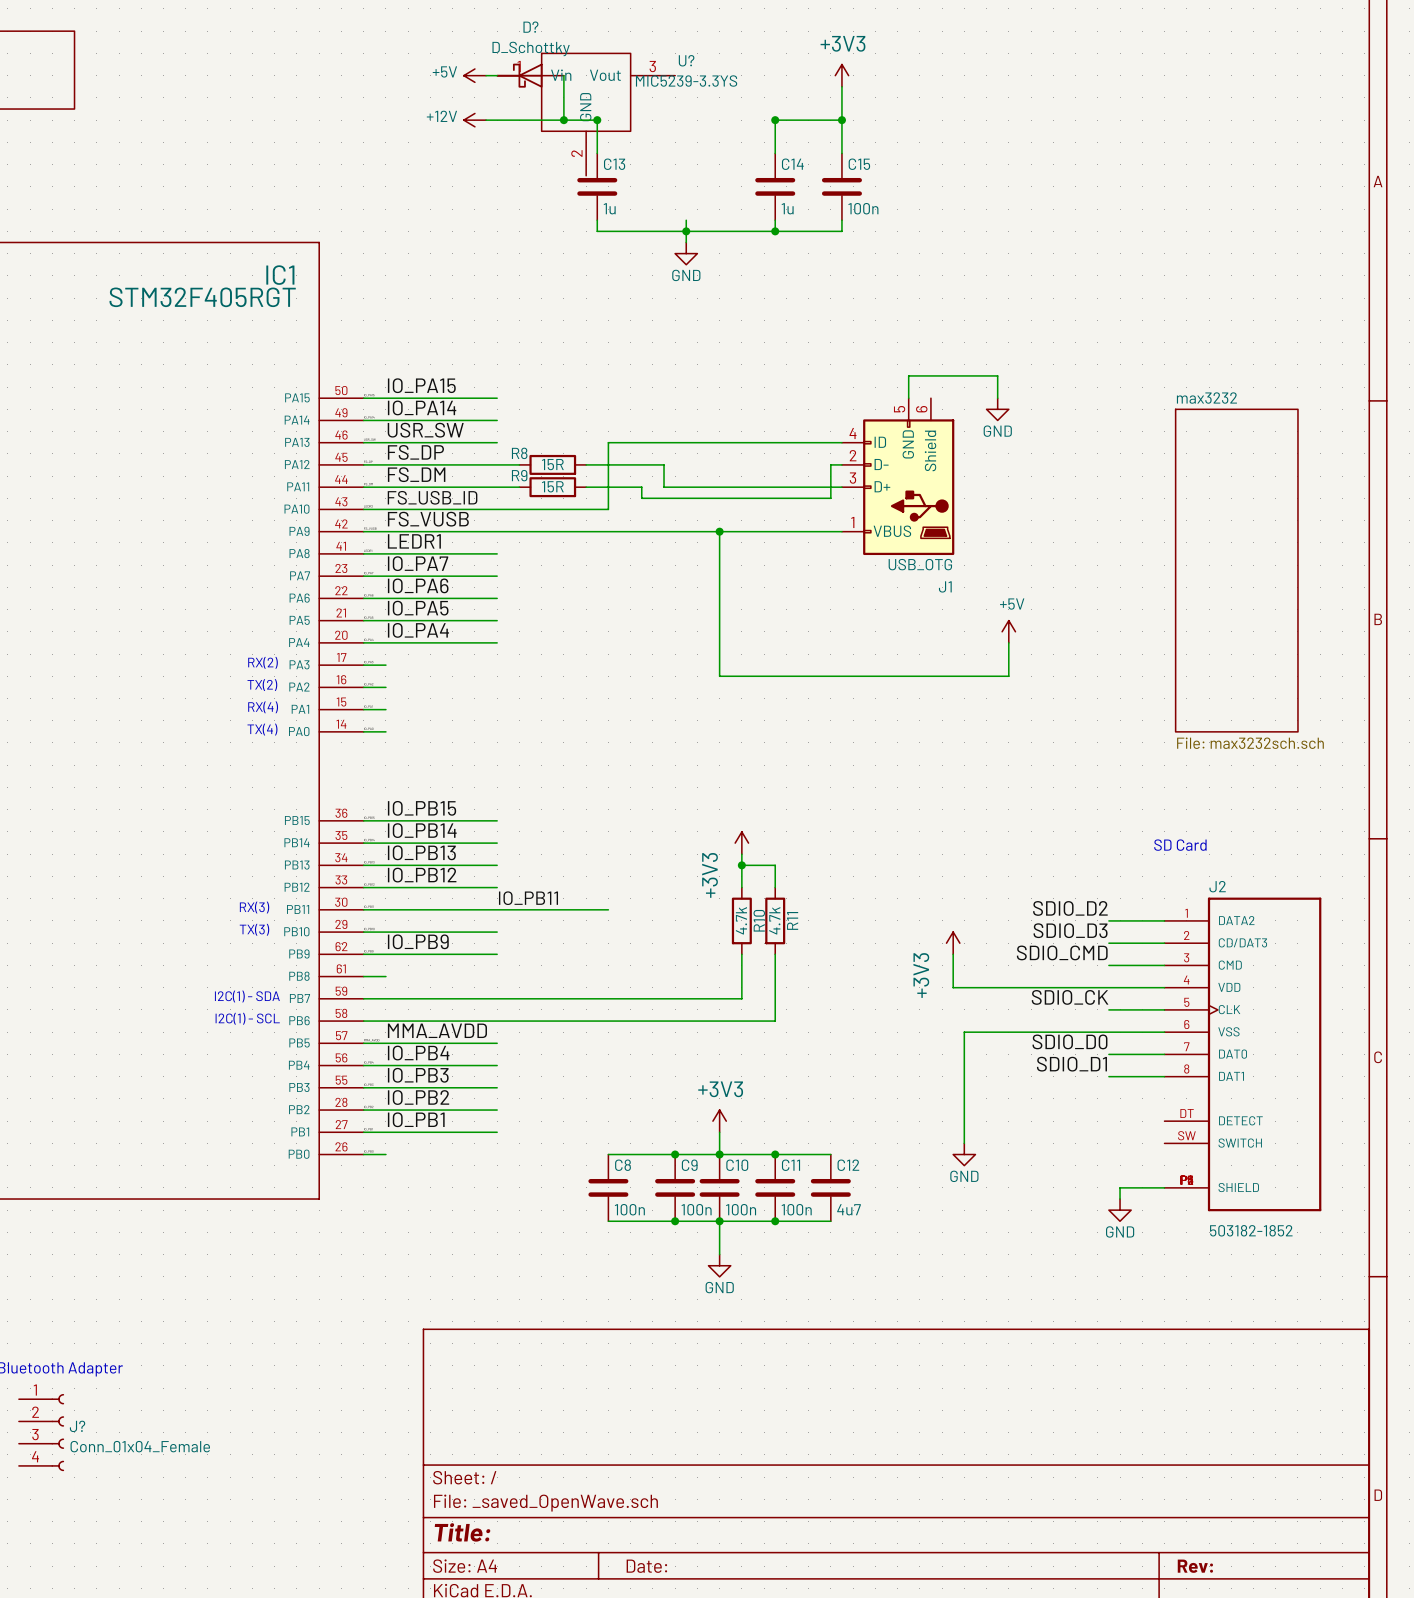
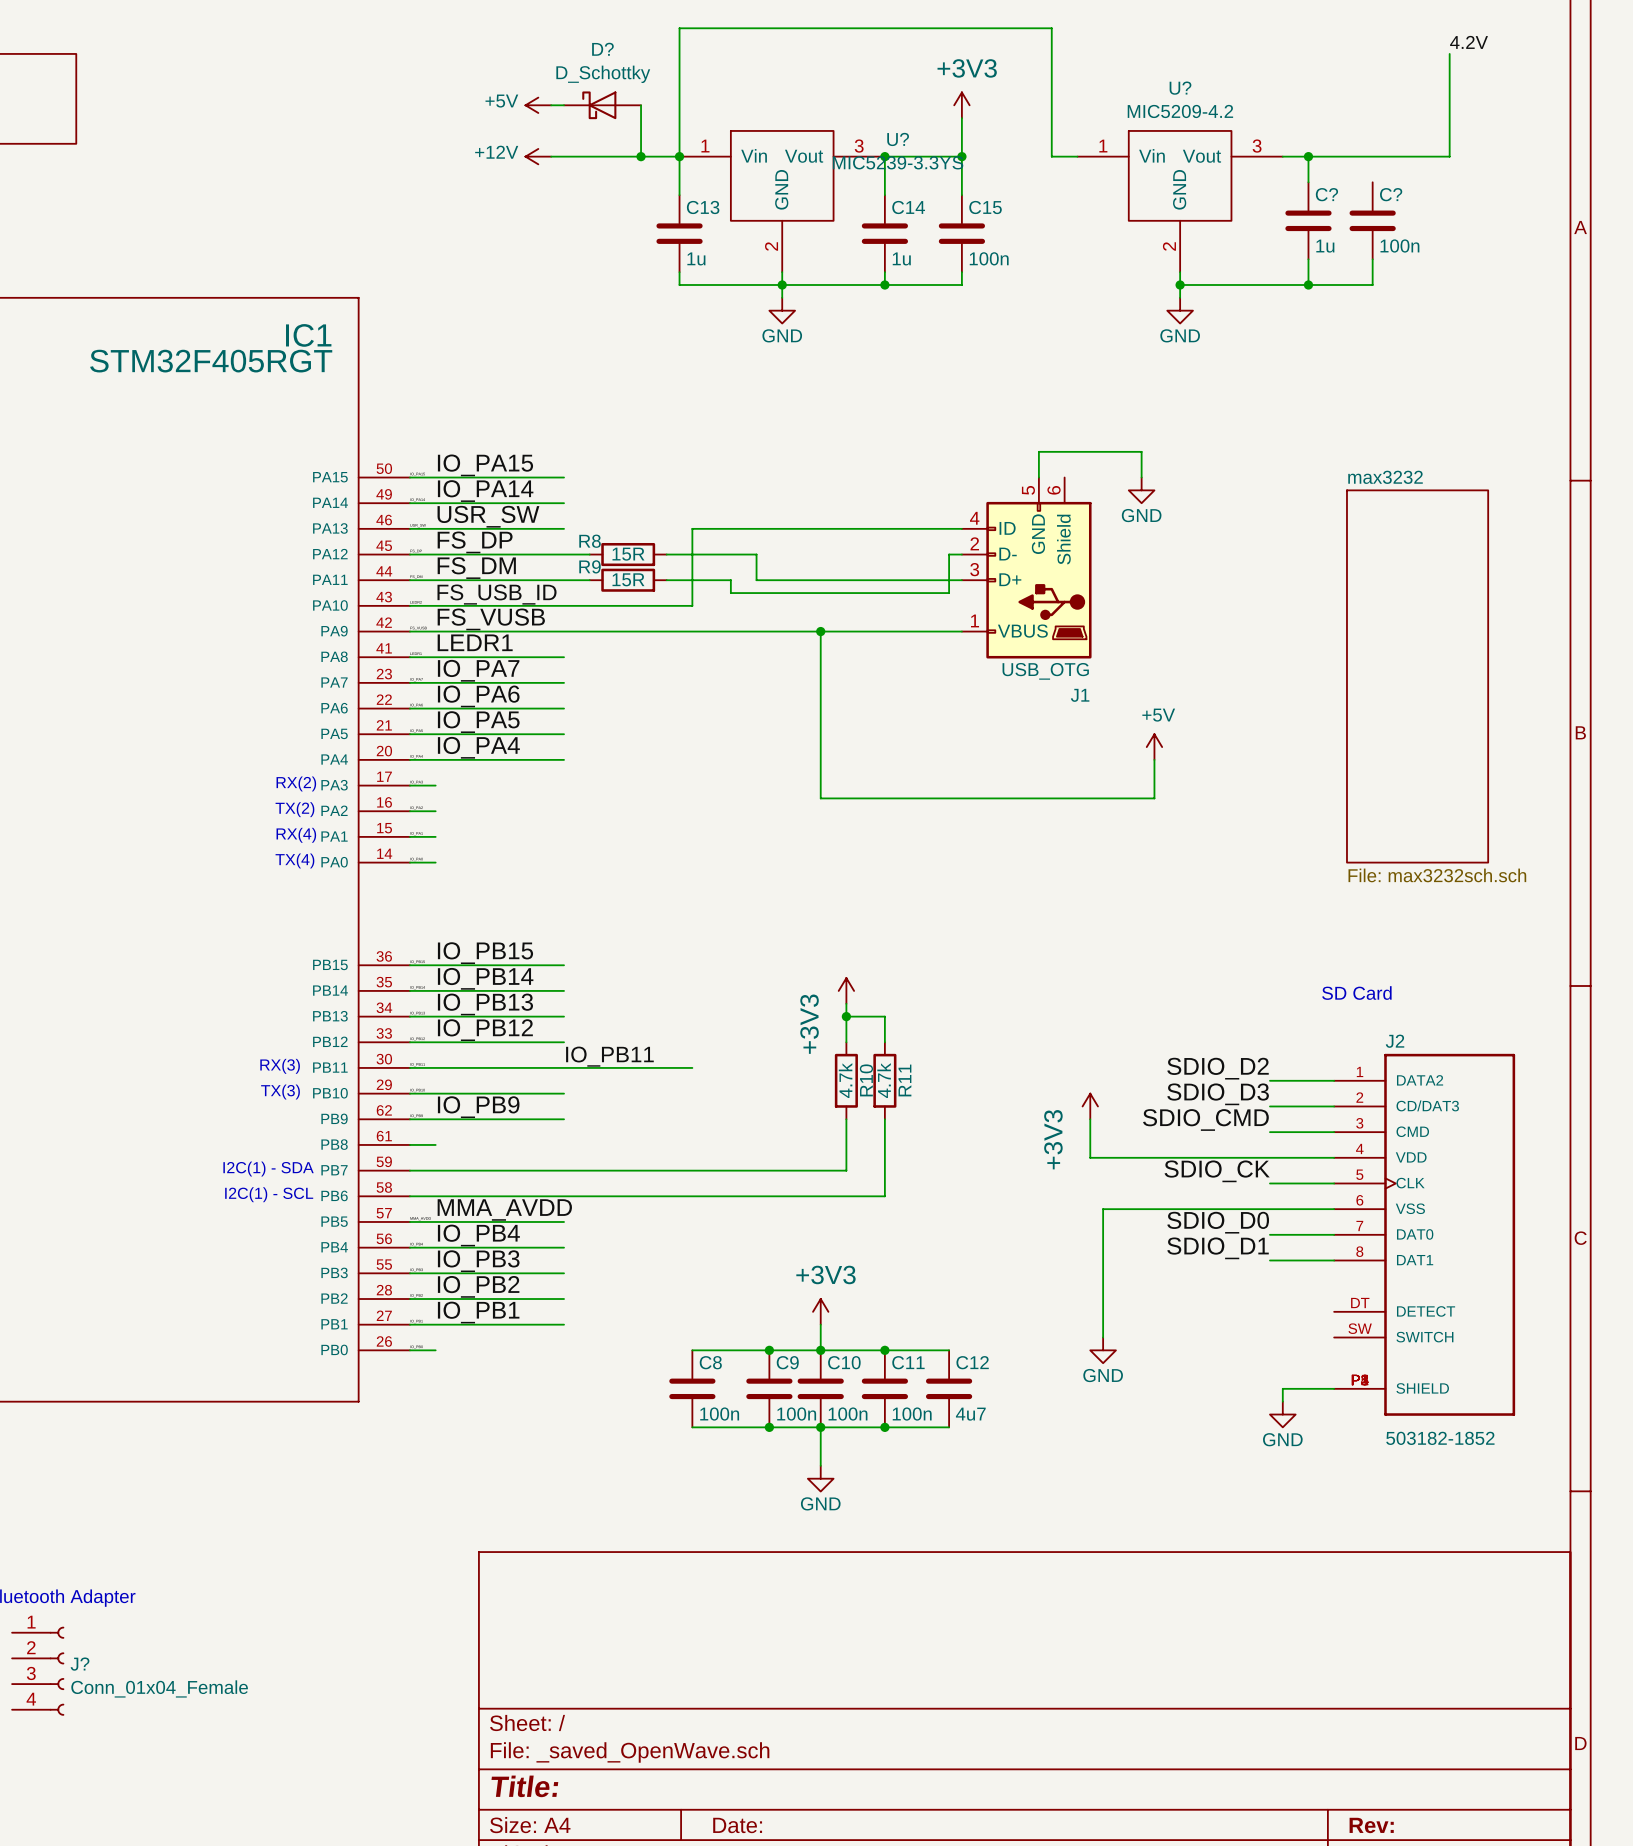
label: none -> 4.2V (1469, 42)
wire: none -> (1449, 53) (1449, 156) (1282, 156)
U? position: (586, 114) -> (782, 201)
wire: none -> (679, 156) (679, 28) (1051, 28) (1051, 156) (1077, 156)
wire: none -> (1308, 156) (1308, 182)
junction: none -> (1308, 156)
U?: none -> MIC5209-4.2 (1180, 201)
C?: none -> 1u (1308, 220)
C?: none -> 100n (1372, 220)
wire: none -> (1308, 259) (1308, 284)
wire: none -> (1372, 259) (1372, 284) (1180, 284)
wire: none -> (1180, 272) (1180, 297)
junction: none -> (1180, 284)
junction: none -> (1308, 284)
power symbol: none -> GND (1180, 310)

